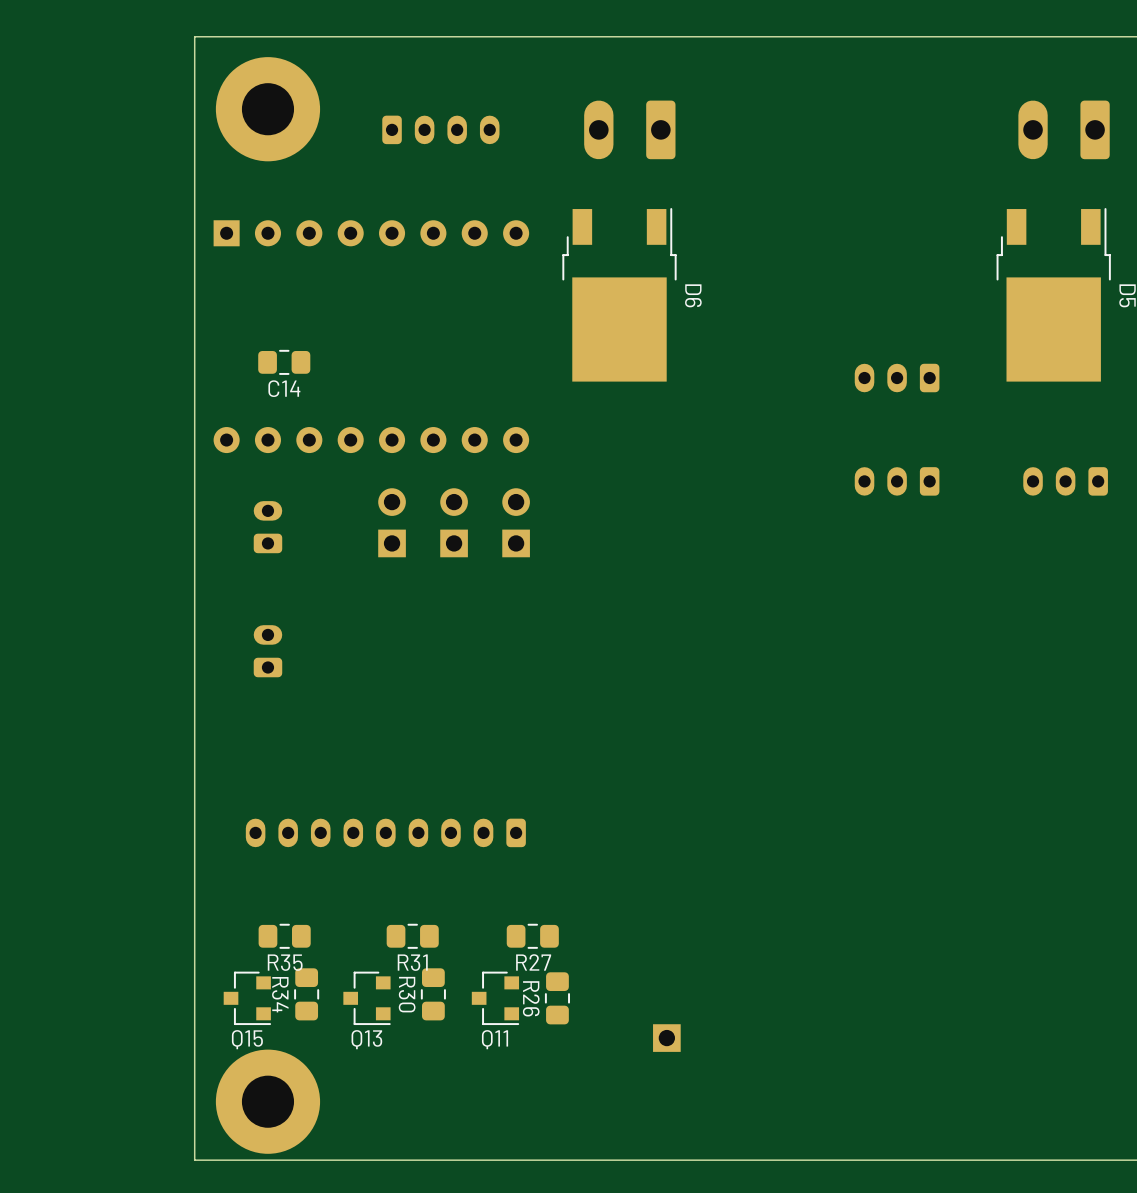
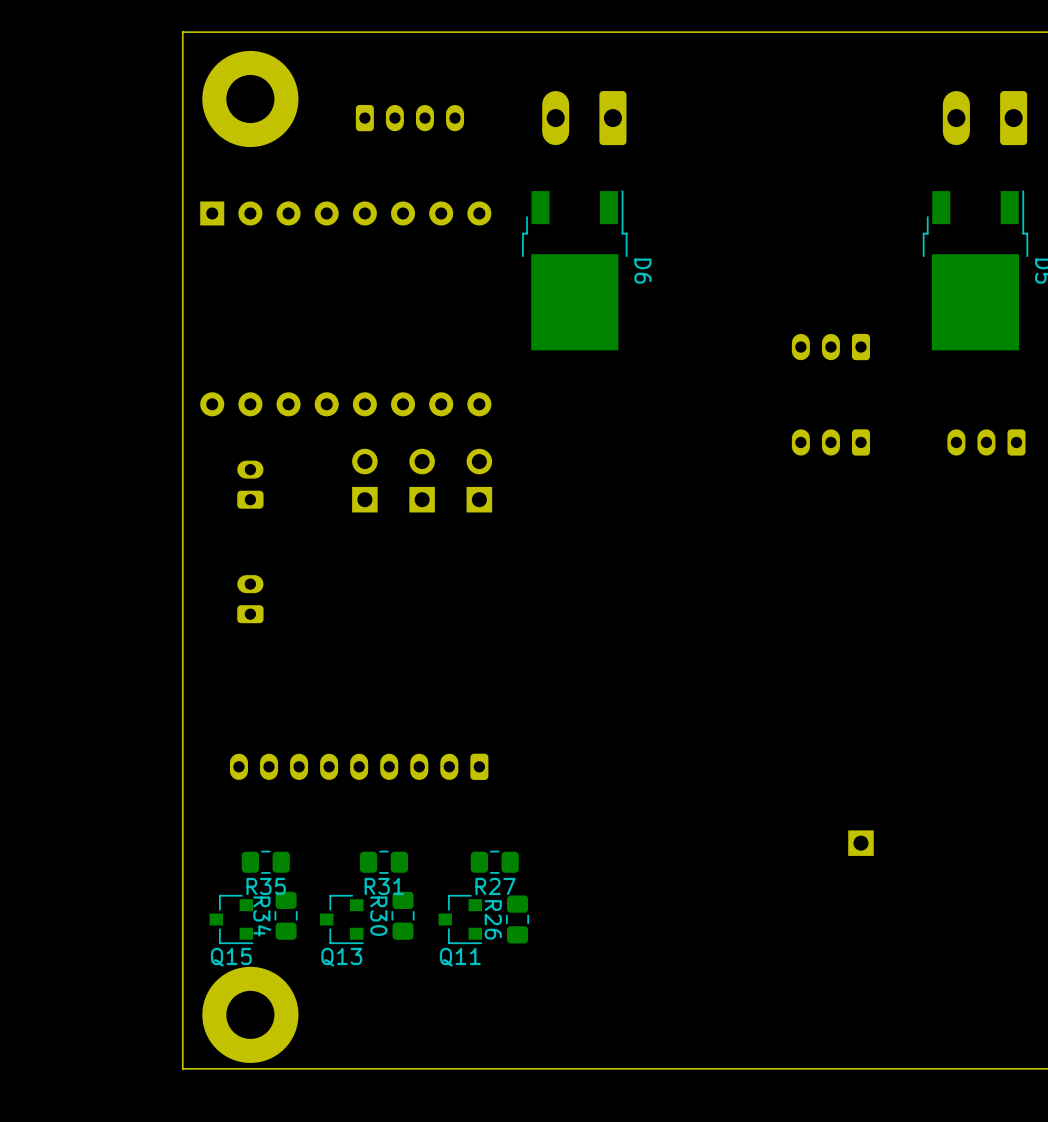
C14: (284, 362) -> none
part position: (666, 1038) -> (860, 843)

